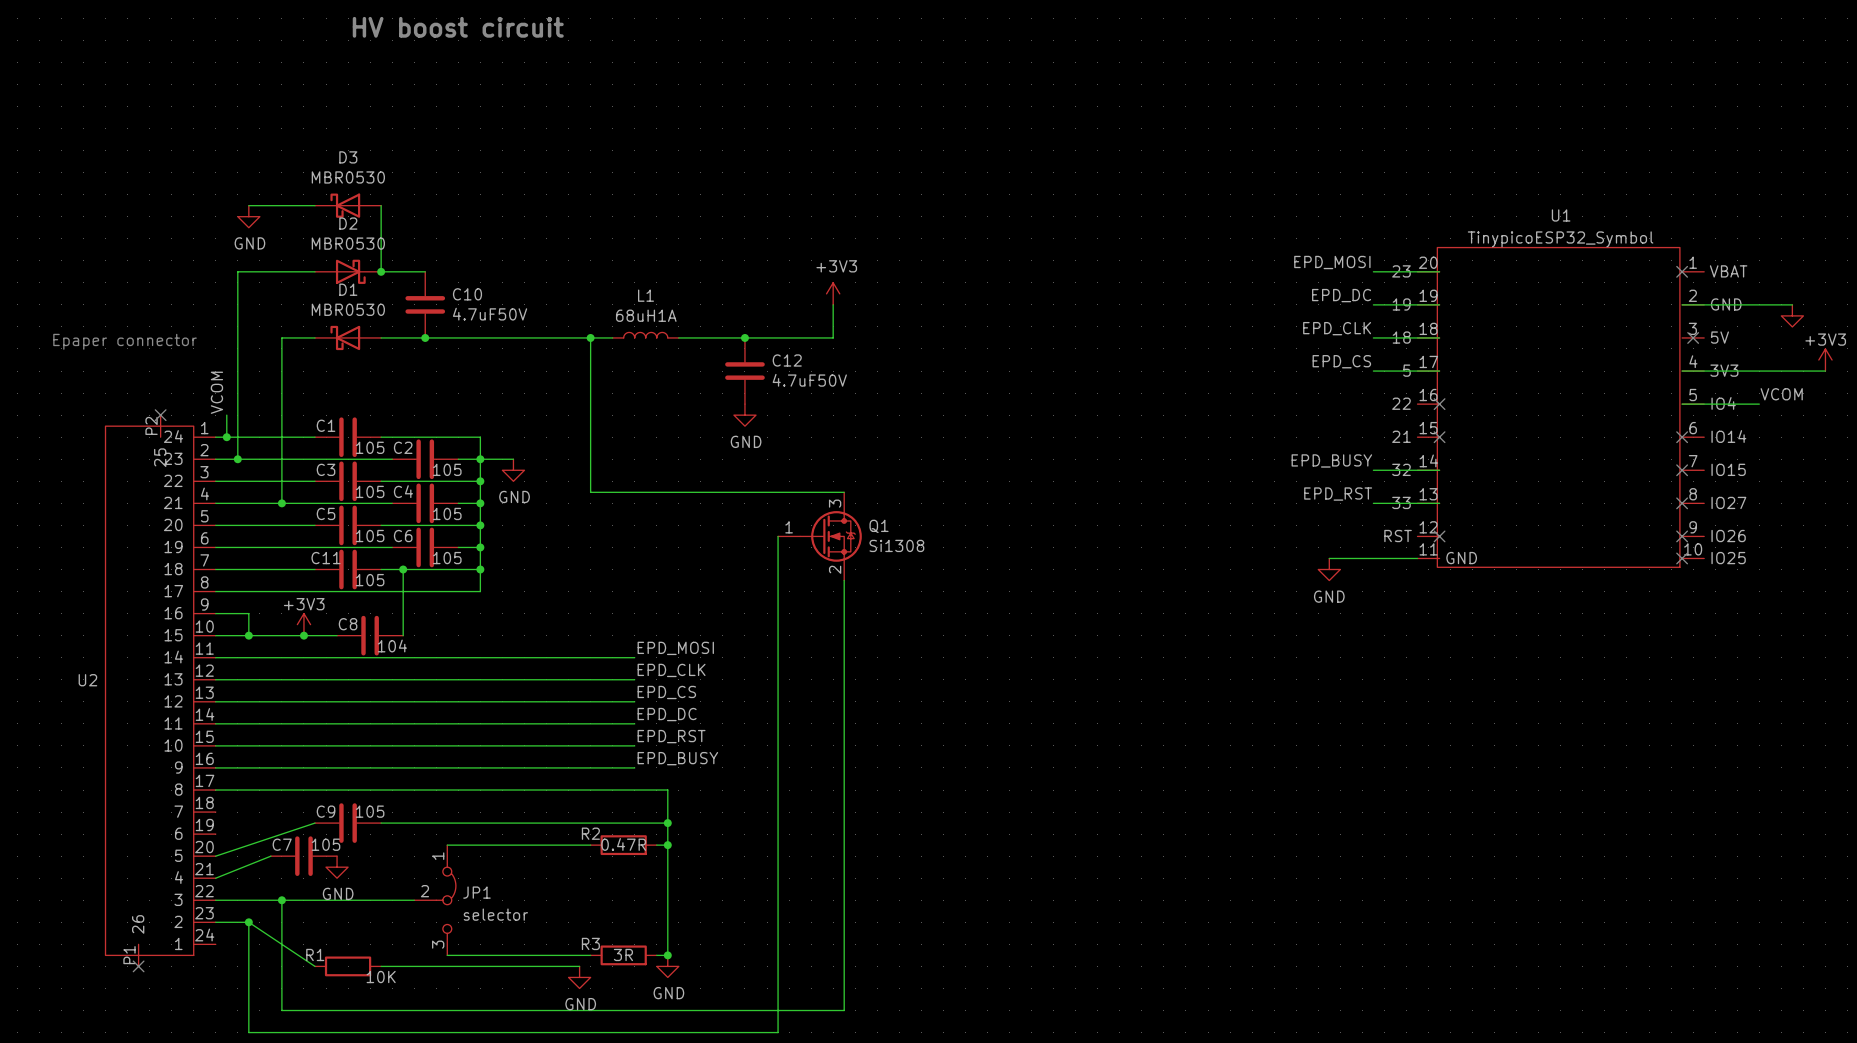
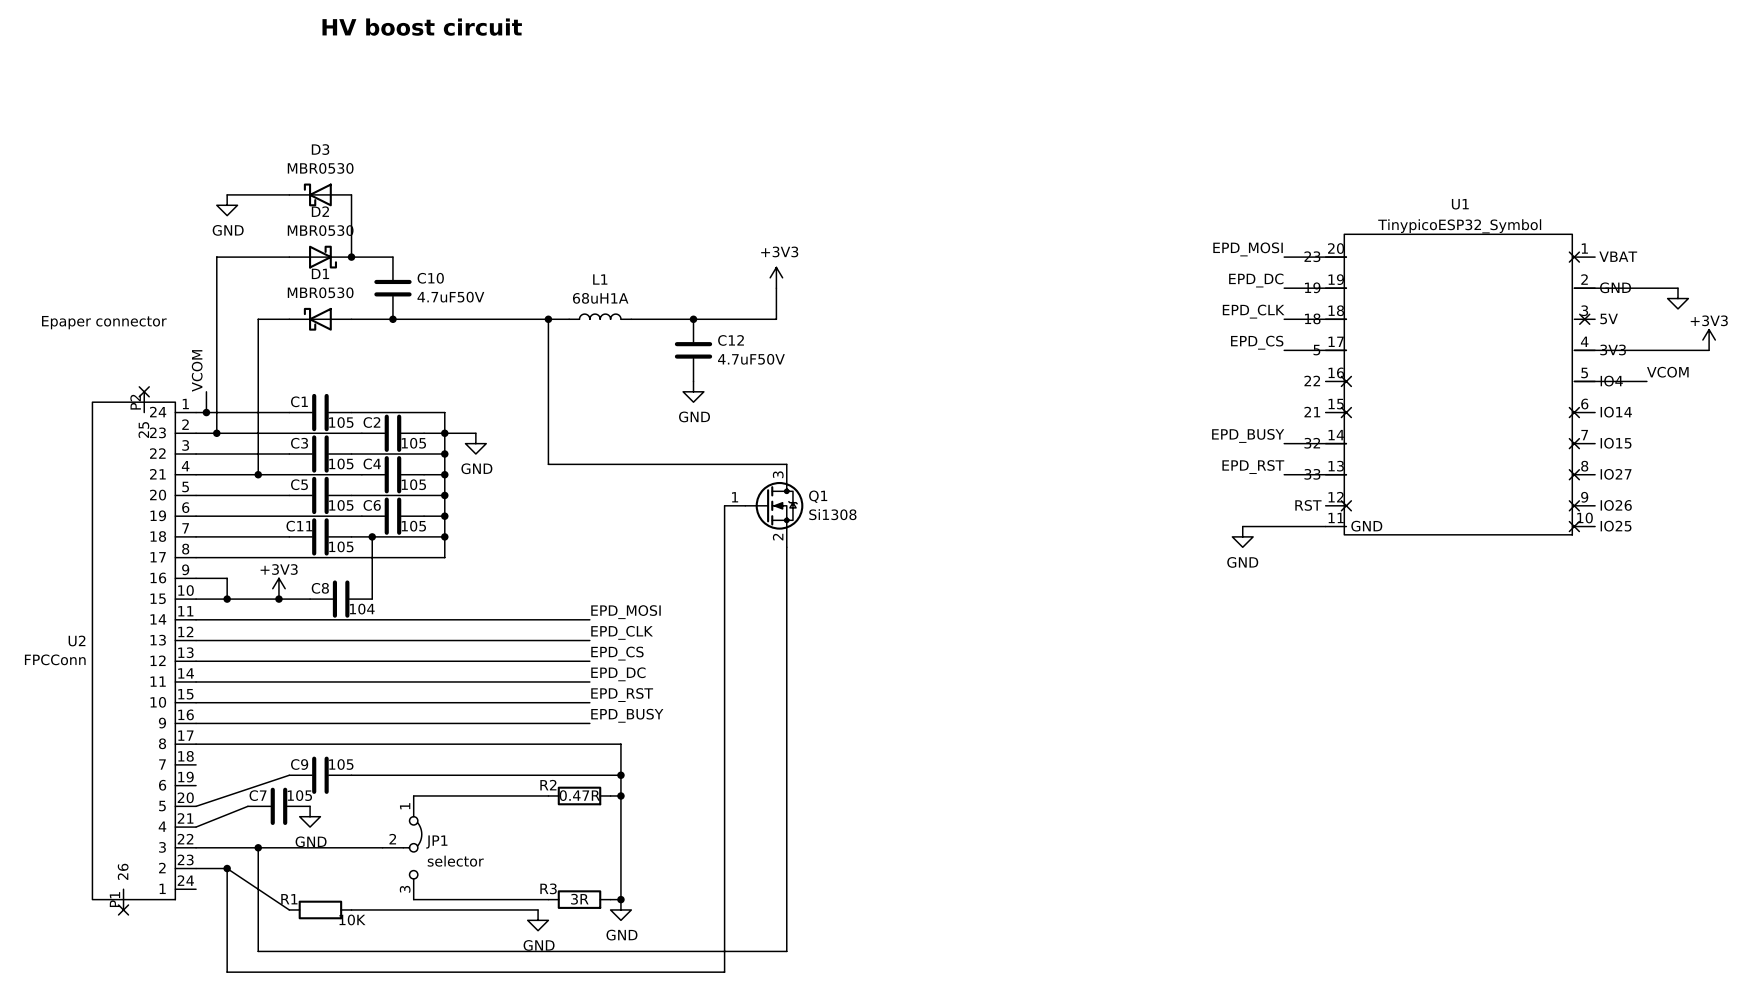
U2 value: none -> FPCConn (55, 659)

